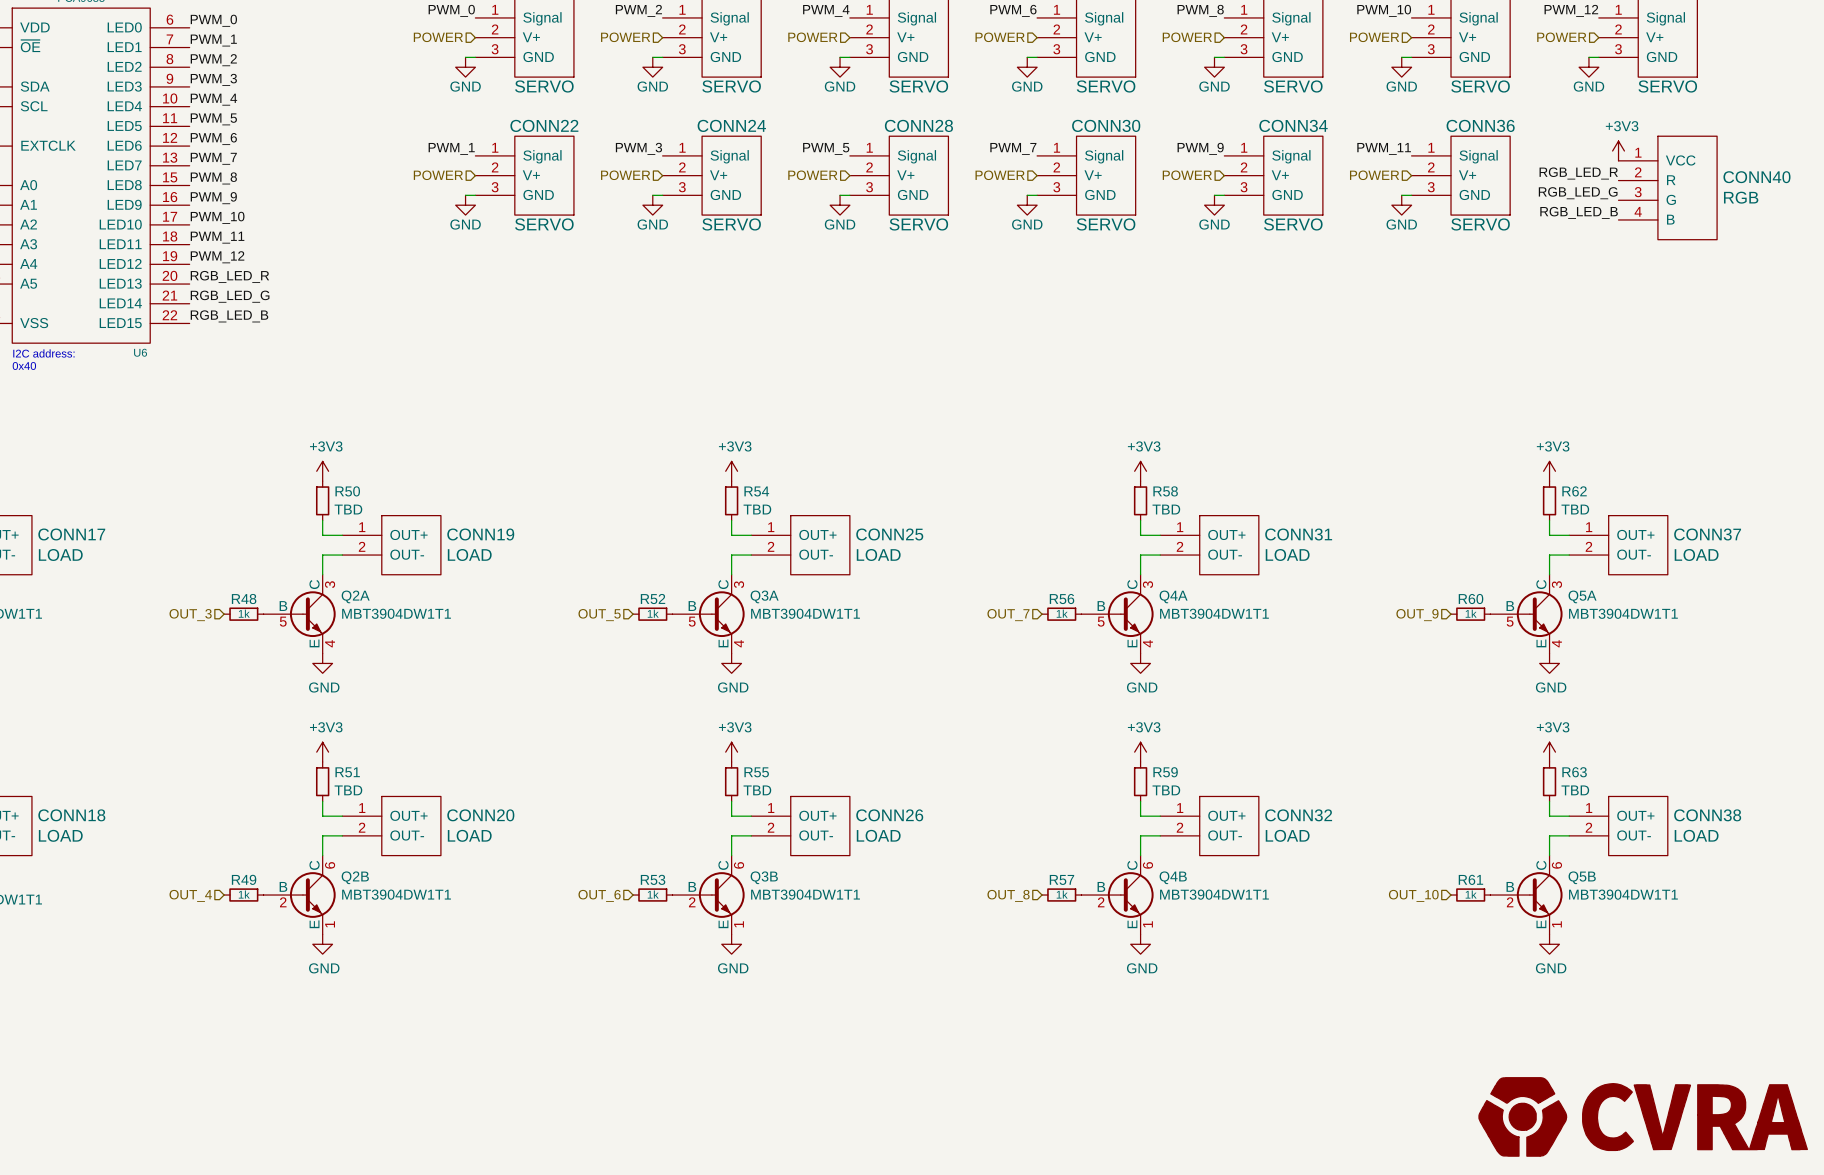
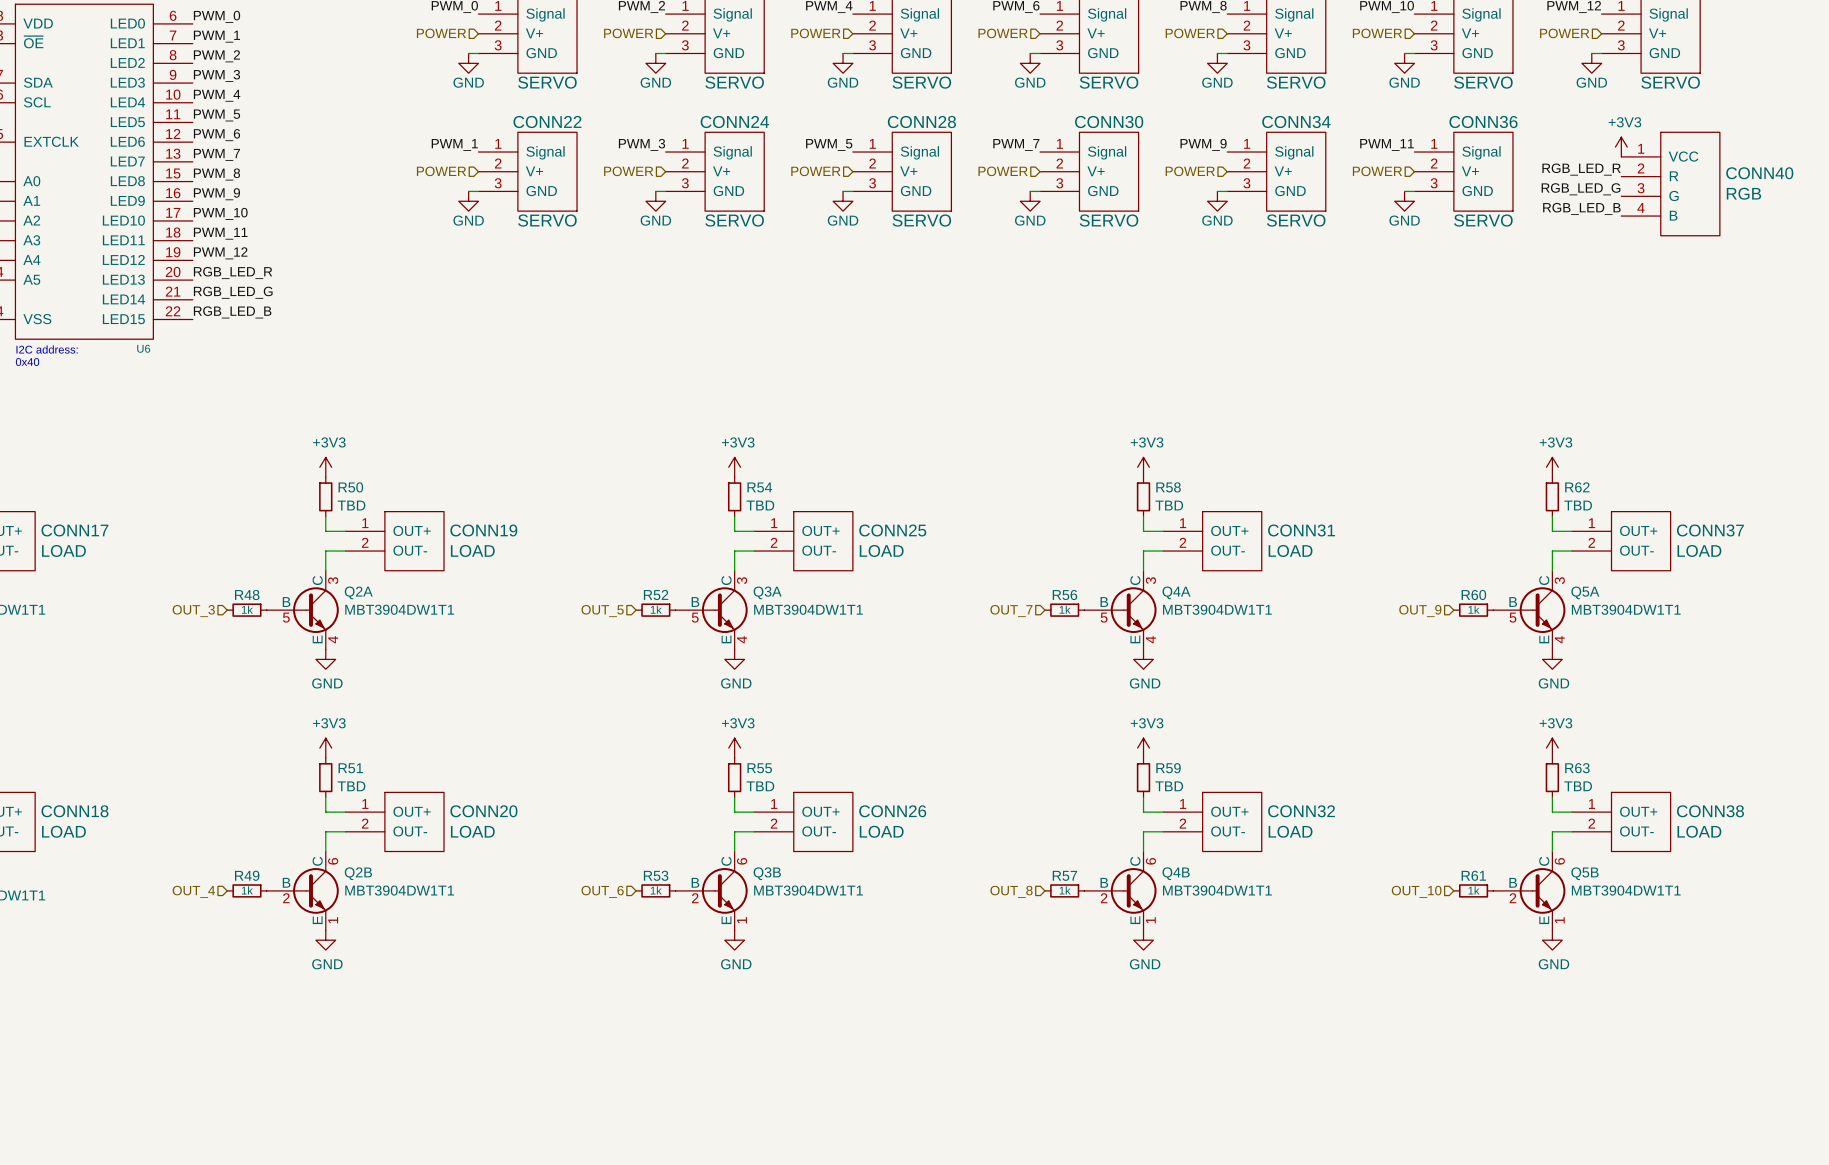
power symbol: (1643, 1116) -> none

